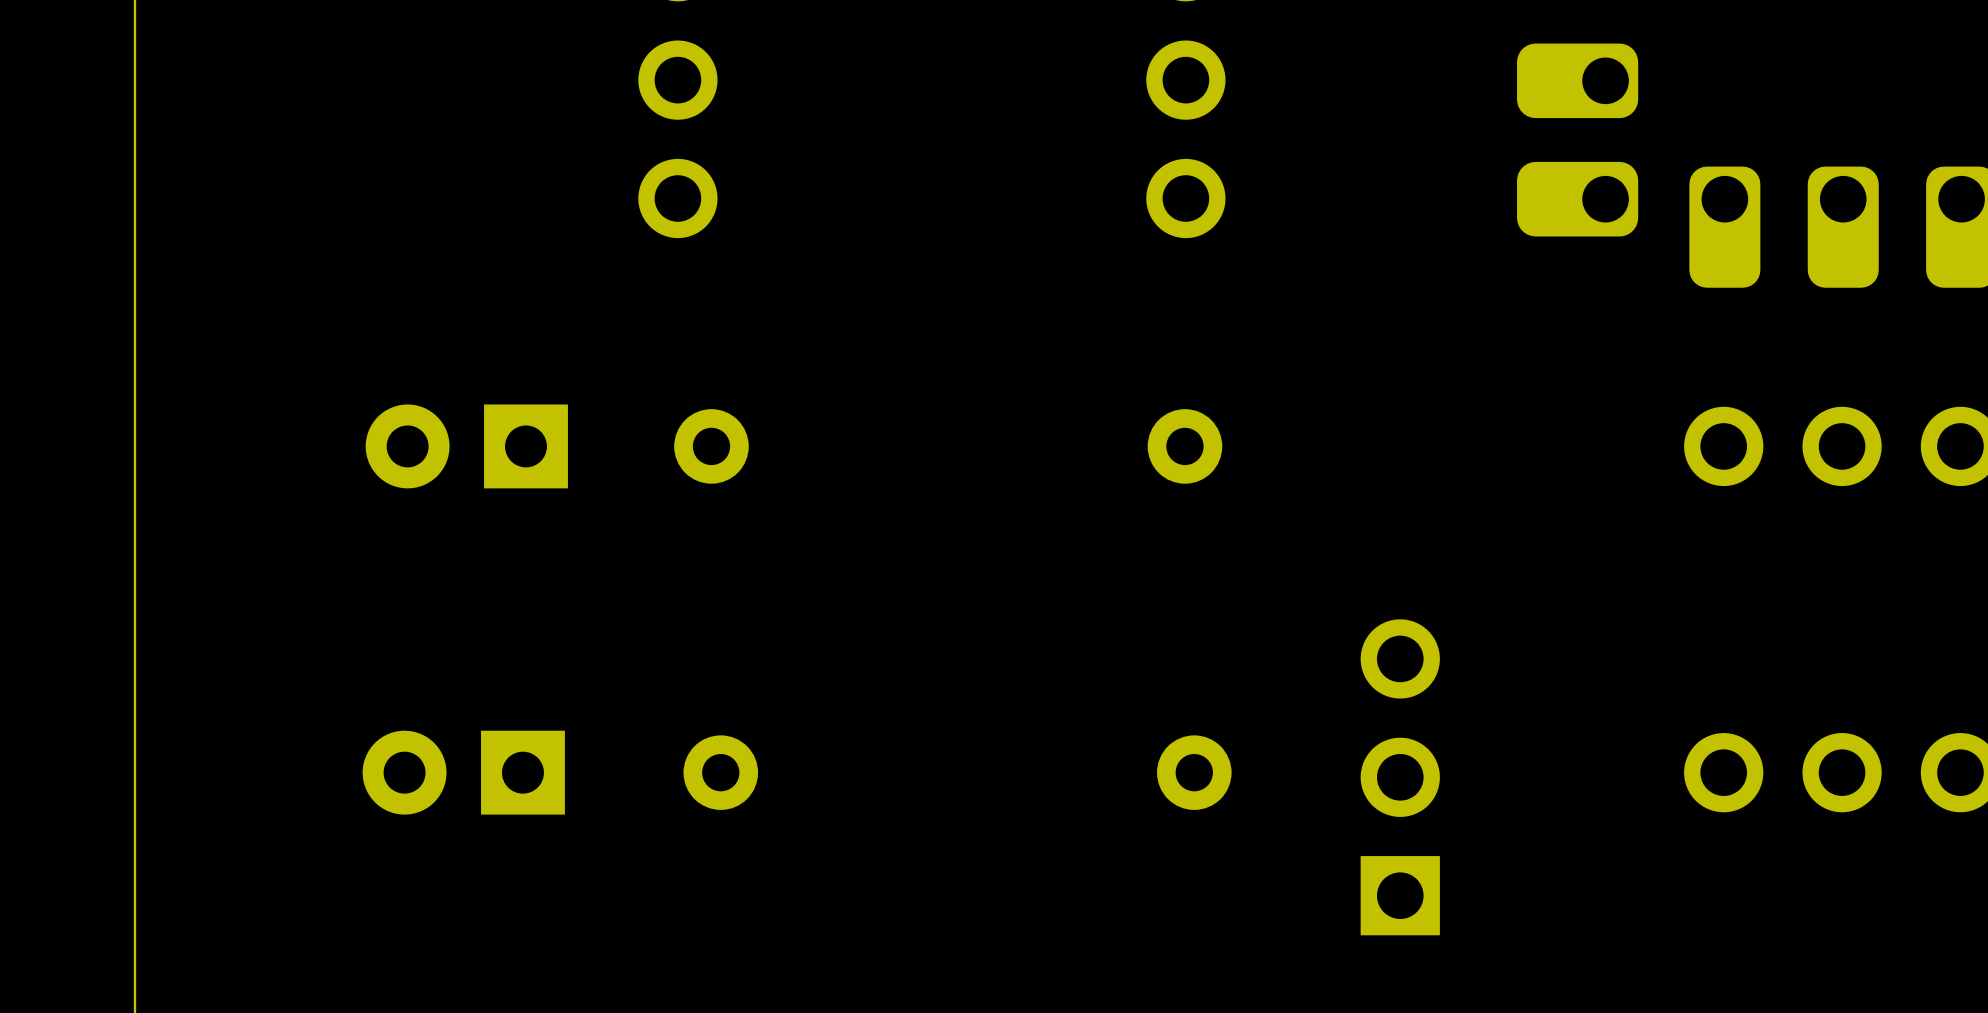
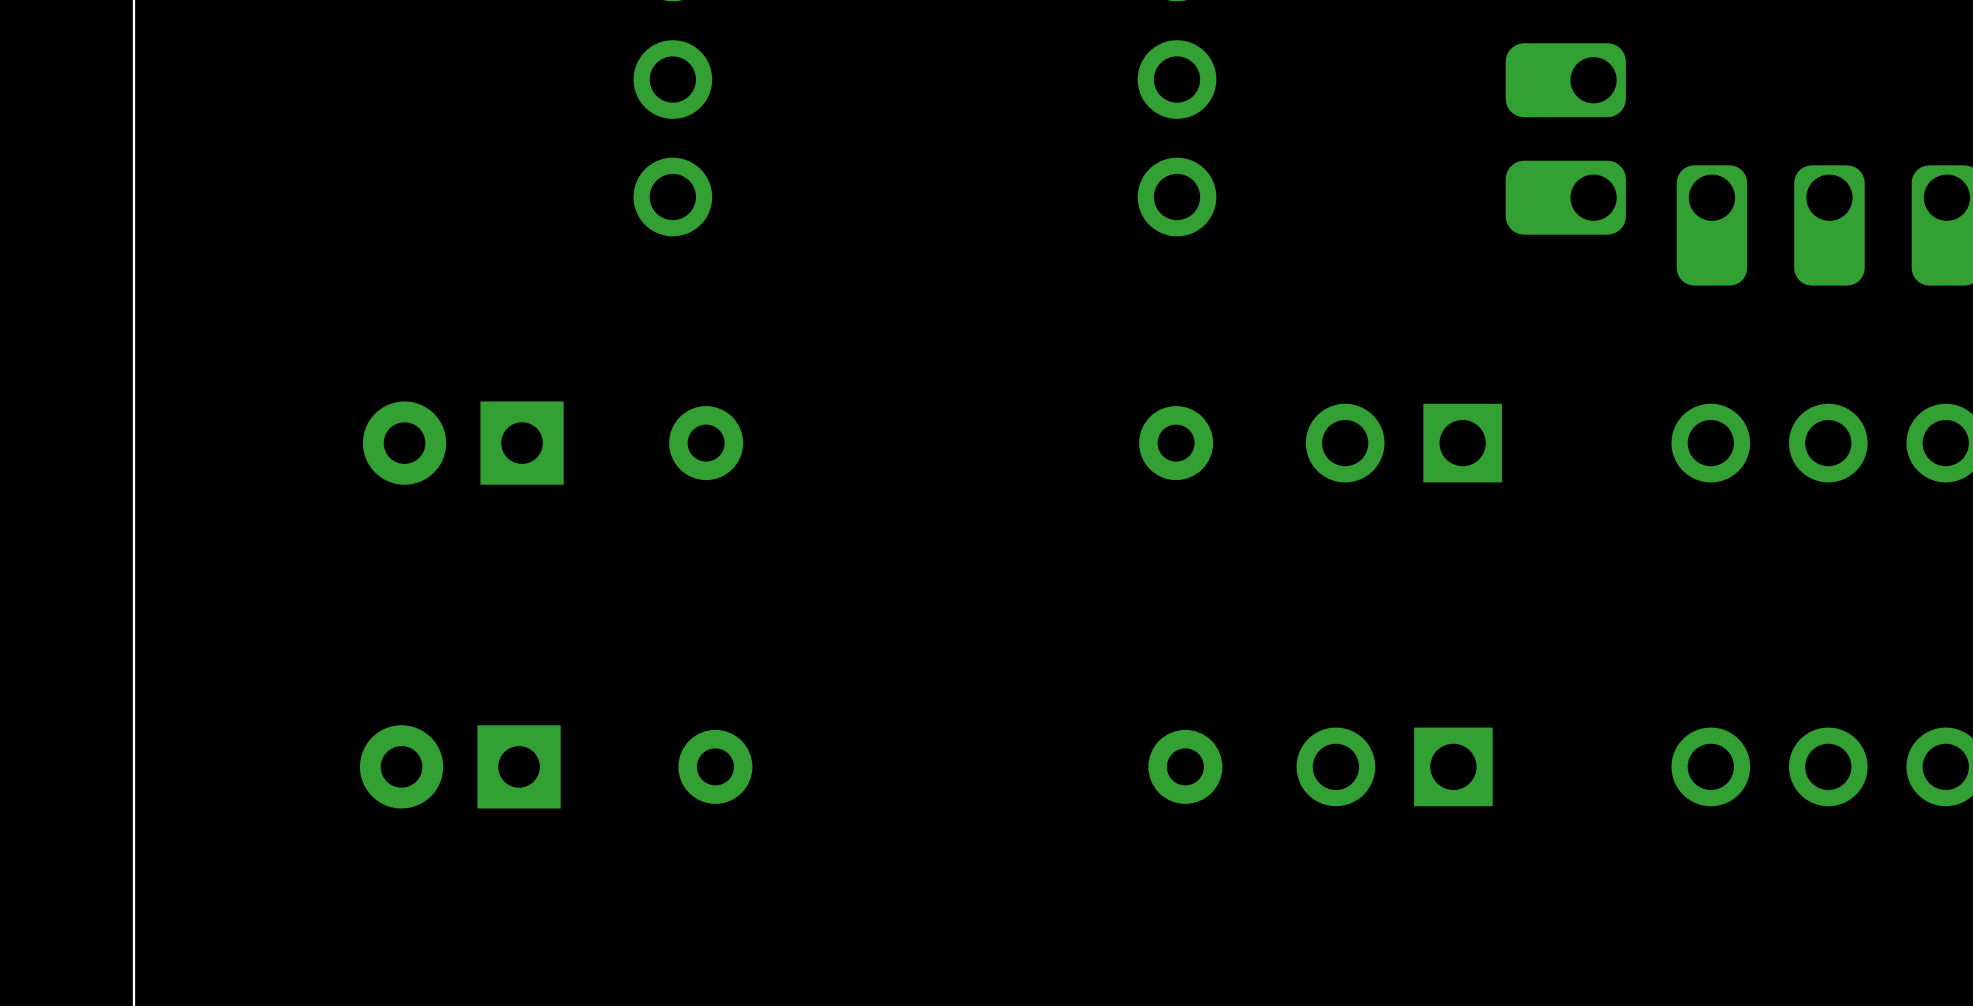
part: none -> (1403, 443)
part footprint: [1360, 619, 1440, 936] -> [1296, 727, 1493, 807]

